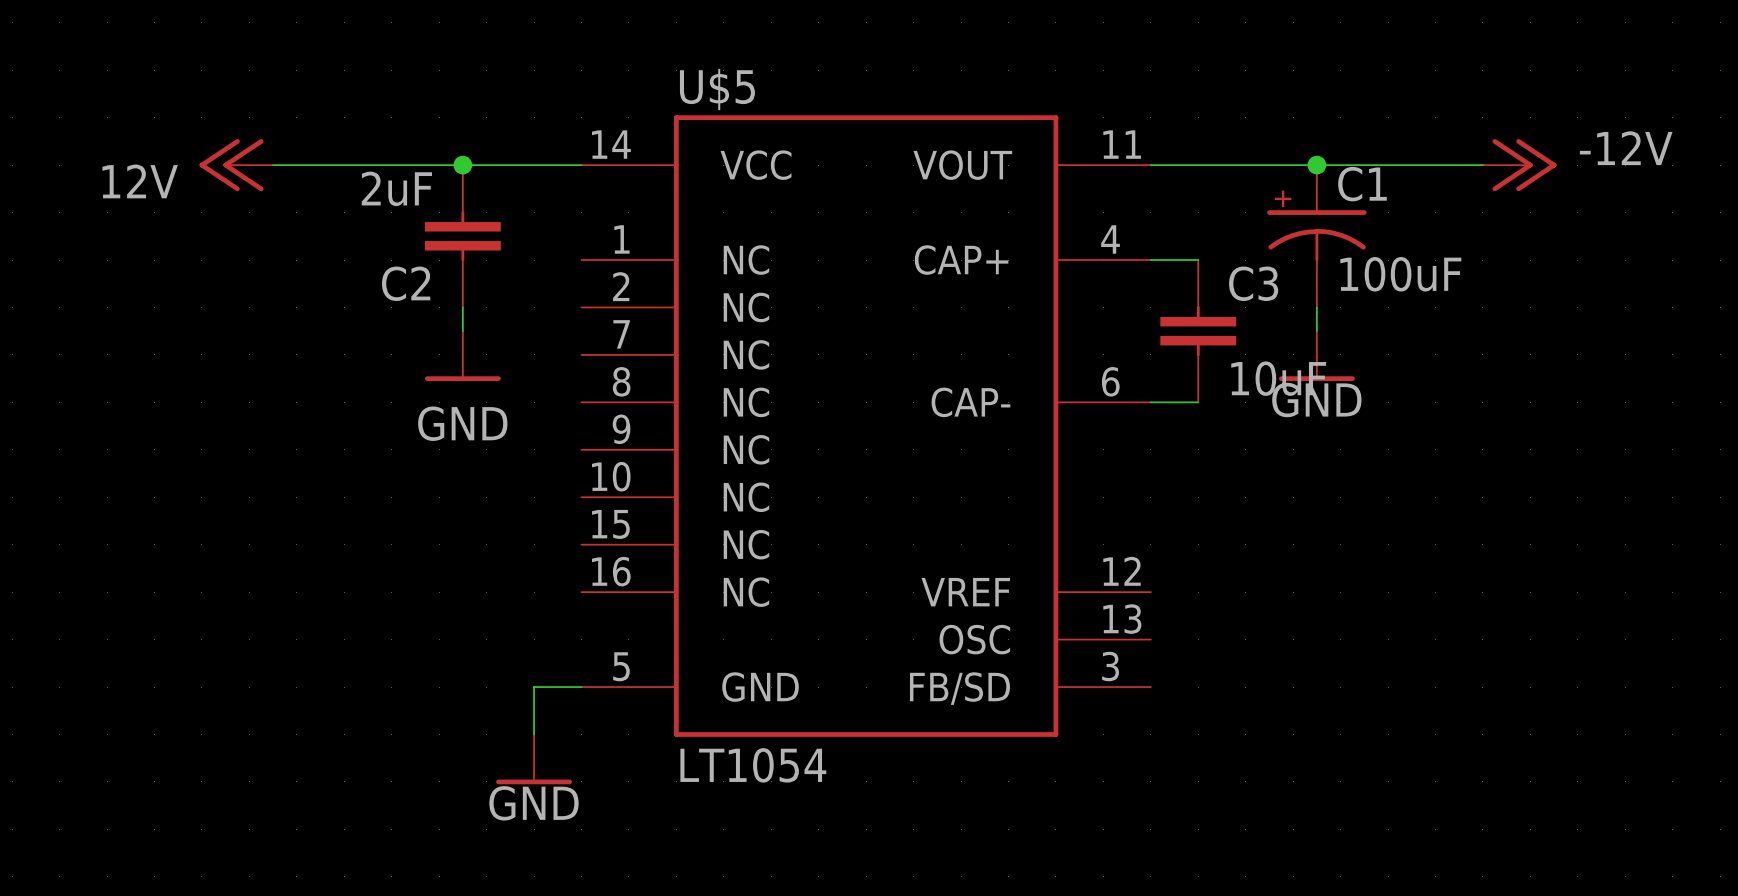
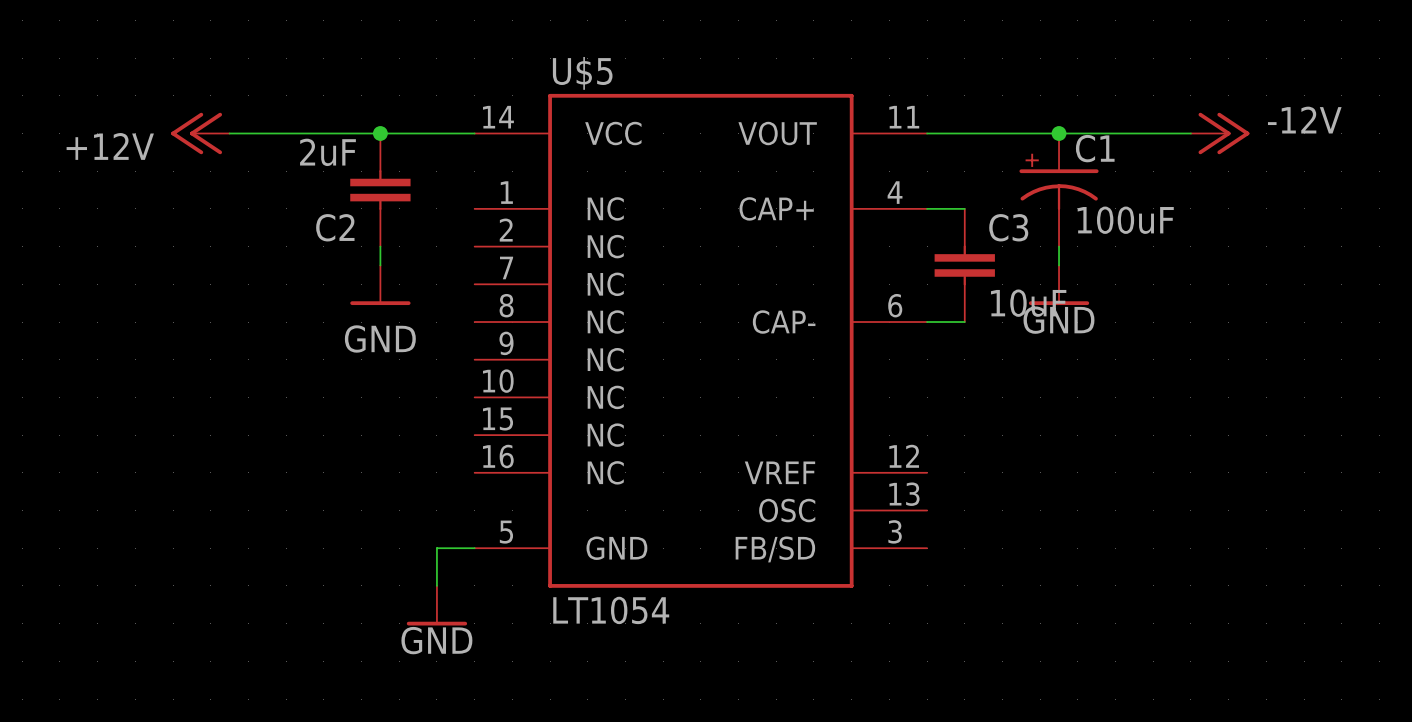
power symbol: 12V (236, 165) -> +12V (200, 133)

